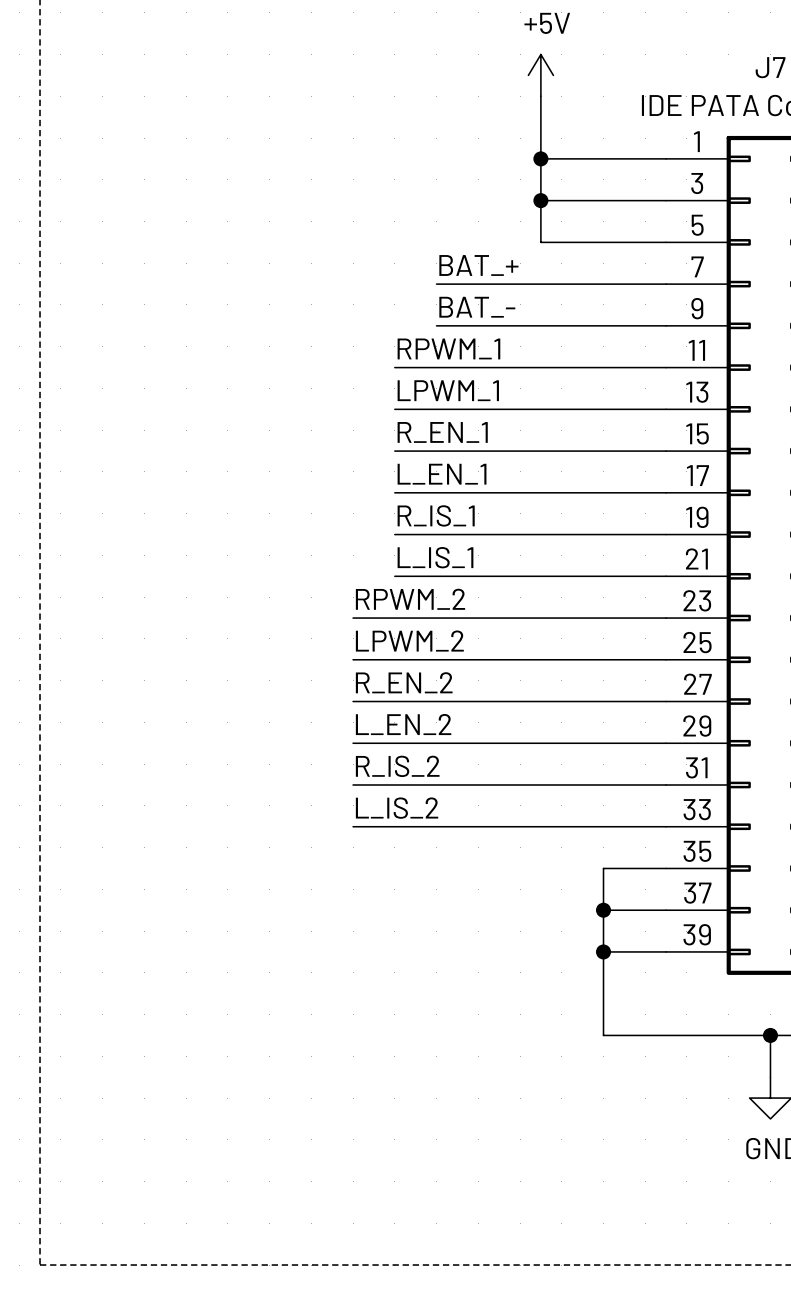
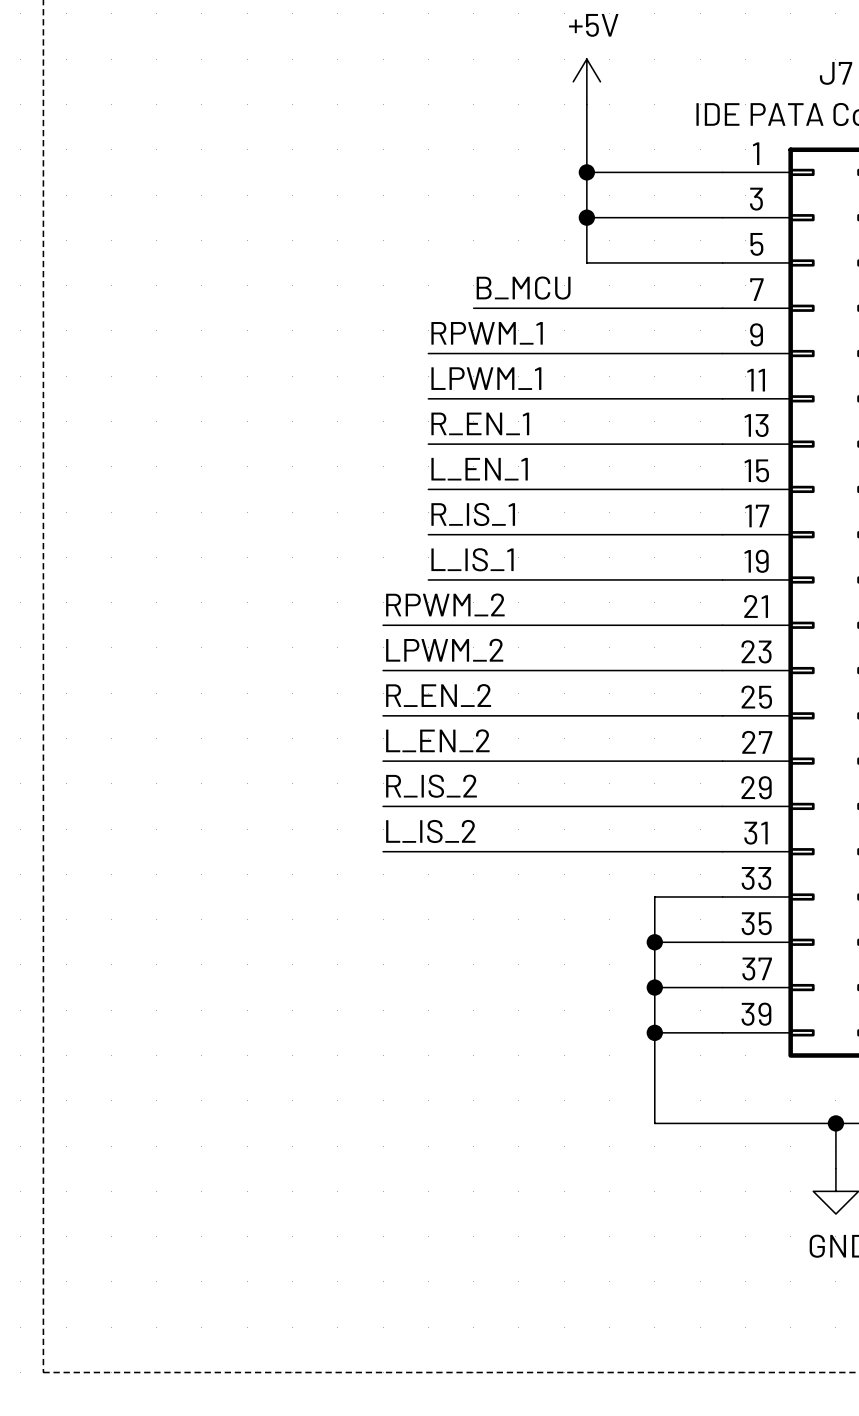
label: BAT_+ (478, 265) -> B_MCU (523, 288)
label: none -> RPWM_1 (487, 333)
label: BAT_- (477, 307) -> none
wire: none -> (428, 353) (473, 353)
label: RPWM_1 (448, 348) -> LPWM_1 (486, 378)
label: LPWM_1 (448, 390) -> R_EN_1 (480, 423)
label: R_EN_1 (442, 432) -> L_EN_1 (479, 469)
label: L_EN_1 (442, 474) -> R_IS_1 (473, 514)
label: R_IS_1 (436, 515) -> L_IS_1 (472, 559)
label: none -> RPWM_2 (445, 604)
label: L_IS_1 (435, 557) -> none
wire: none -> (383, 625) (428, 625)
label: RPWM_2 (410, 599) -> LPWM_2 (444, 650)
label: LPWM_2 (409, 641) -> R_EN_2 (438, 695)
label: R_EN_2 (404, 682) -> L_EN_2 (437, 740)
label: L_EN_2 (403, 724) -> R_IS_2 (431, 786)
label: R_IS_2 (397, 766) -> L_IS_2 (430, 831)
label: L_IS_2 (397, 808) -> none
wire: (353, 826) (603, 826) -> (654, 942) (654, 896)
junction: none -> (654, 942)

